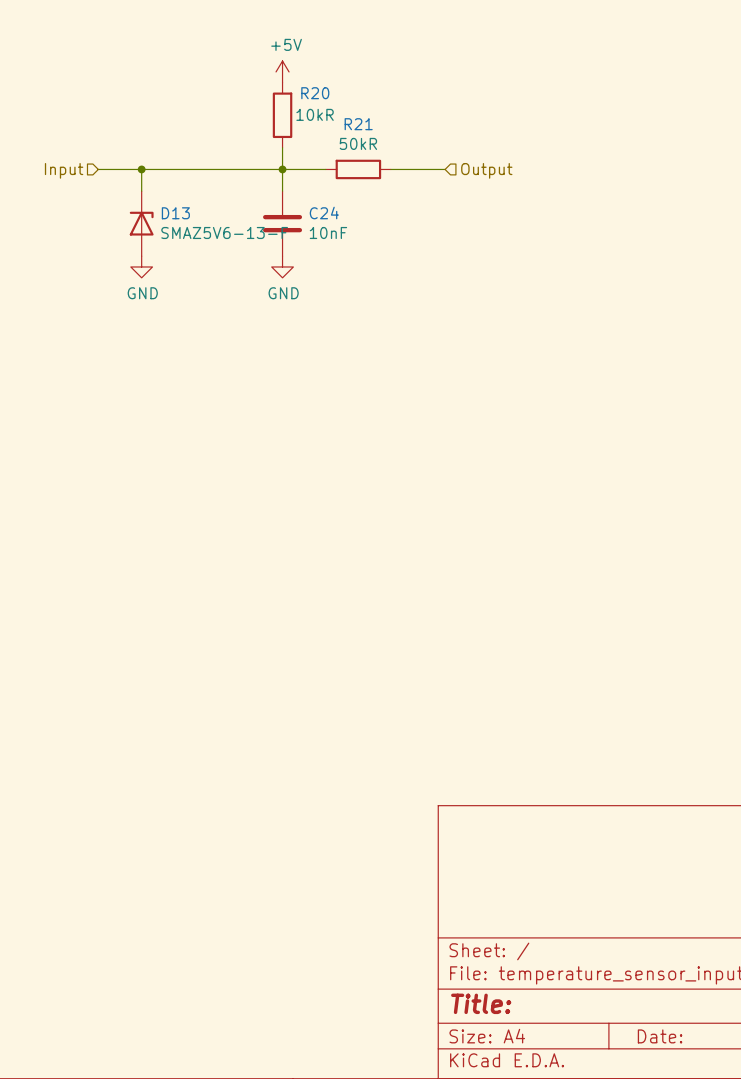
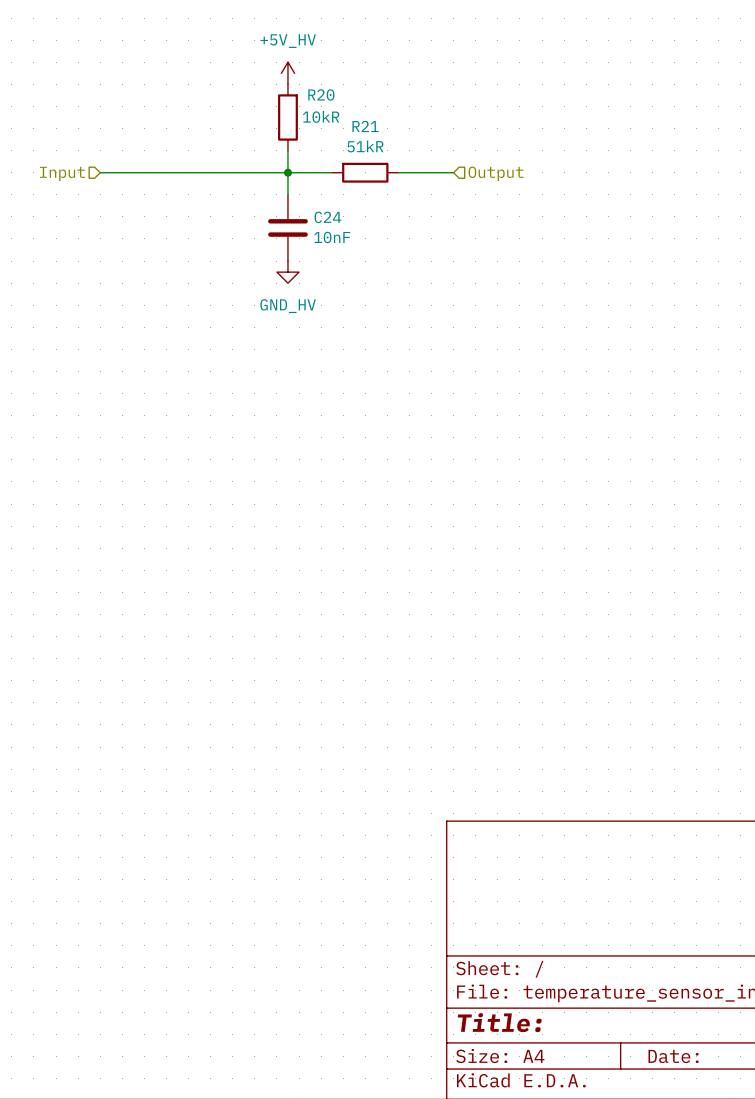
power symbol: +5V (282, 71) -> +5V_HV (287, 73)
R21 value: 50kR (358, 143) -> 51kR (365, 146)
wire: (141, 169) (141, 191) -> none
junction: (141, 169) -> none
D13: SMAZ5V6-13-F (141, 223) -> none
power symbol: GND (141, 266) -> none
power symbol: GND (282, 266) -> GND_HV (287, 272)

